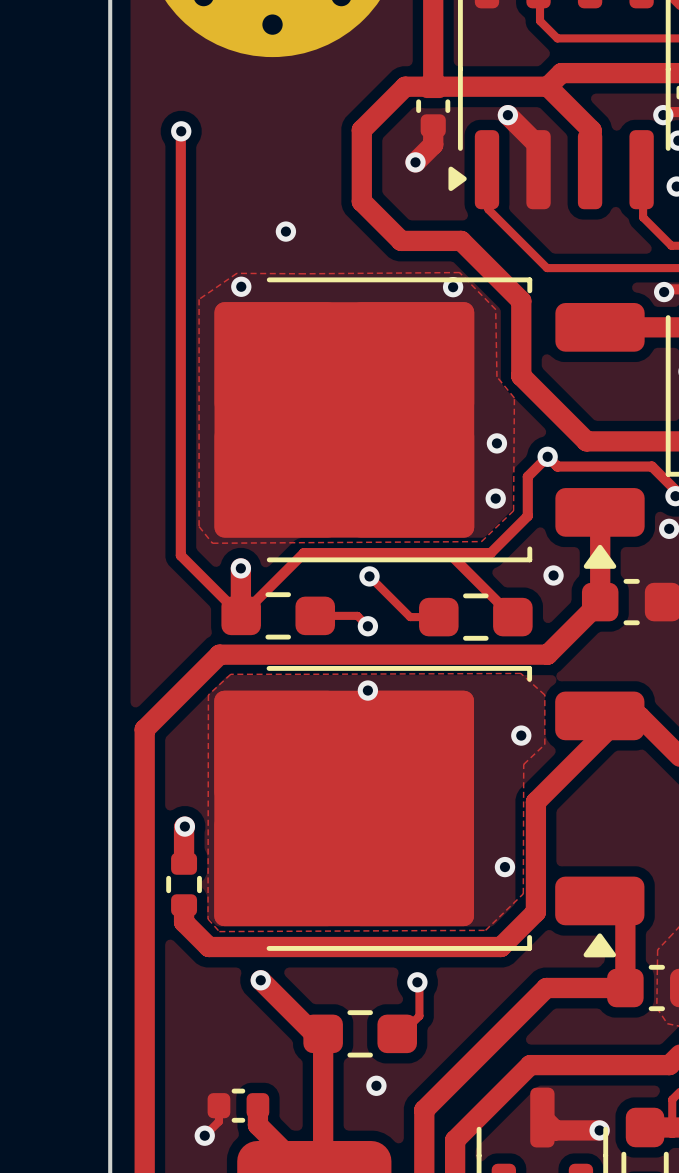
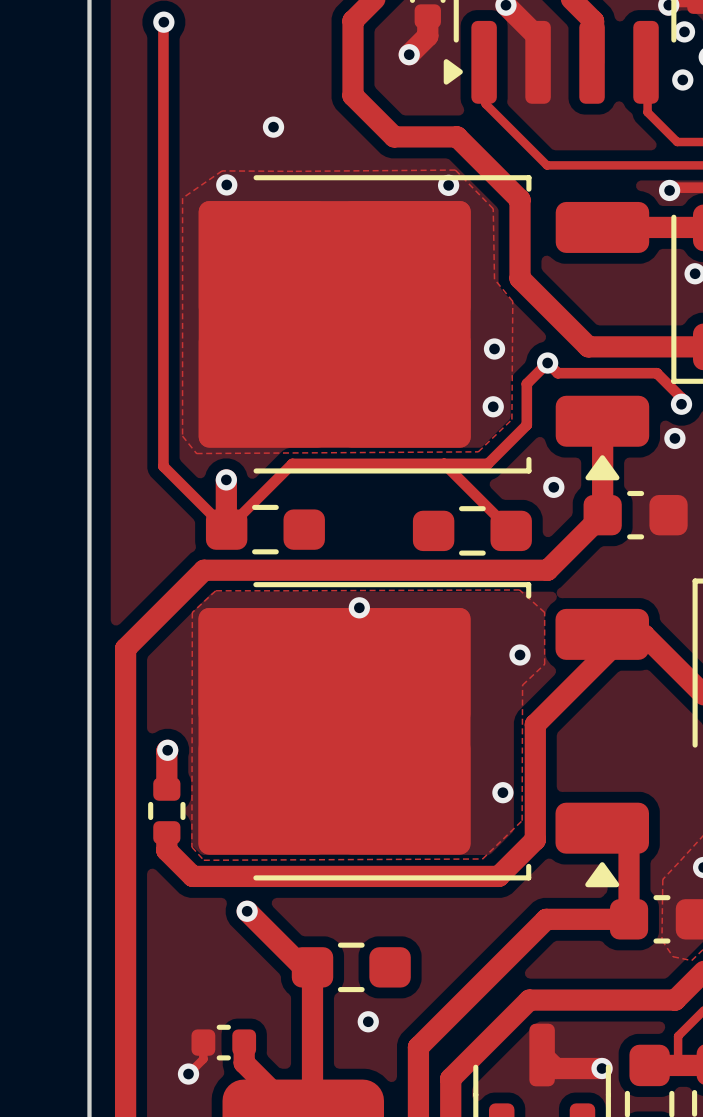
track: (369, 576) (410, 617) (438, 617) -> none
via: (369, 576) -> none
track: (315, 615) (357, 615) (367, 626) -> none
via: (367, 626) -> none
track: (417, 982) (419, 984) (419, 1016) (401, 1033) -> none
via: (417, 982) -> none

